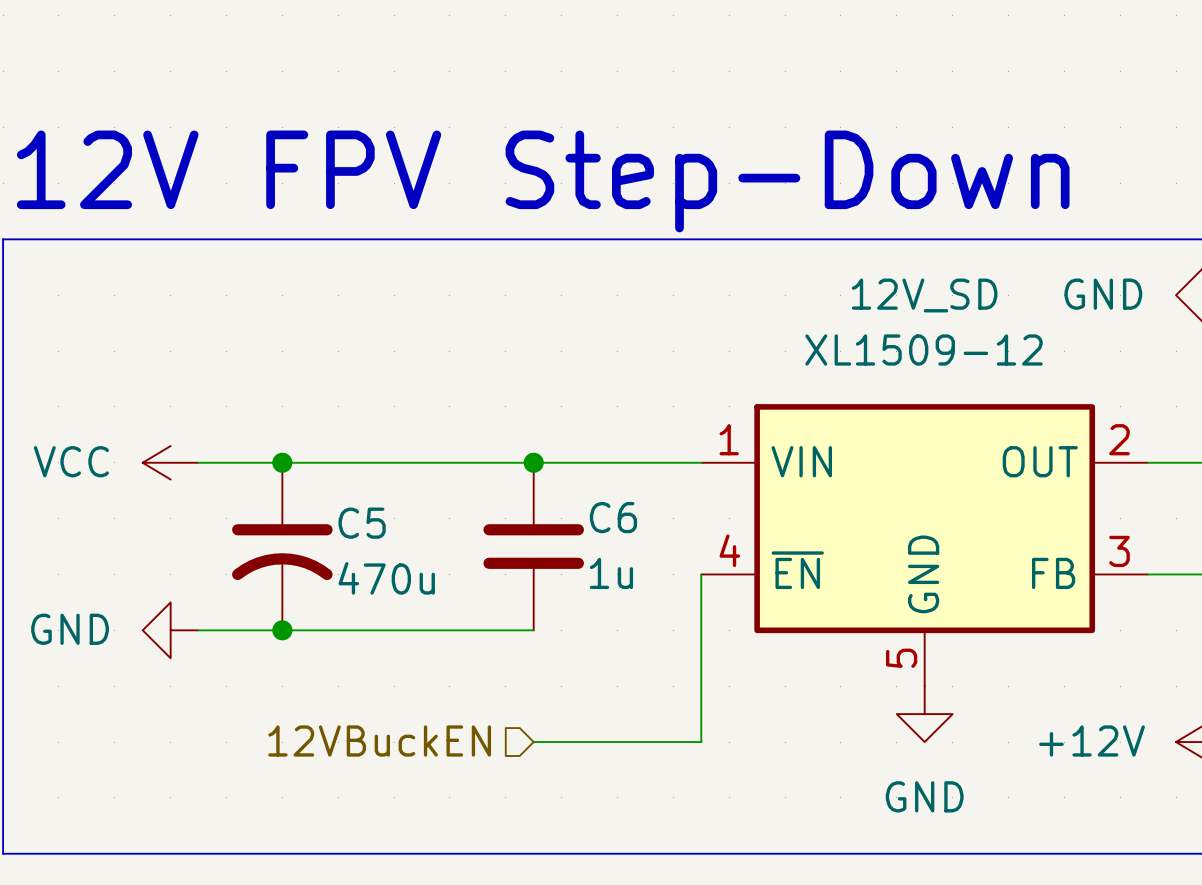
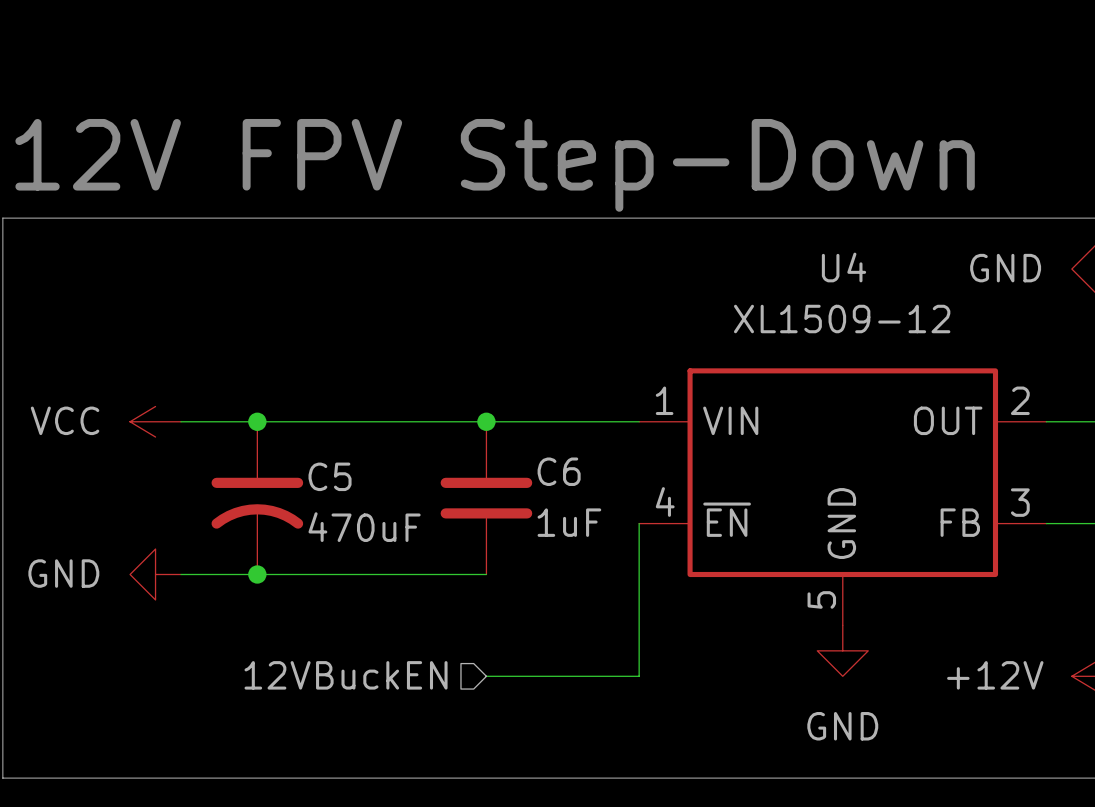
12V_SD name: 12V_SD (924, 295) -> U4 (843, 267)
C6 value: 1u (611, 573) -> 1uF (569, 522)
C5 value: 470u (386, 578) -> 470uF (364, 527)

